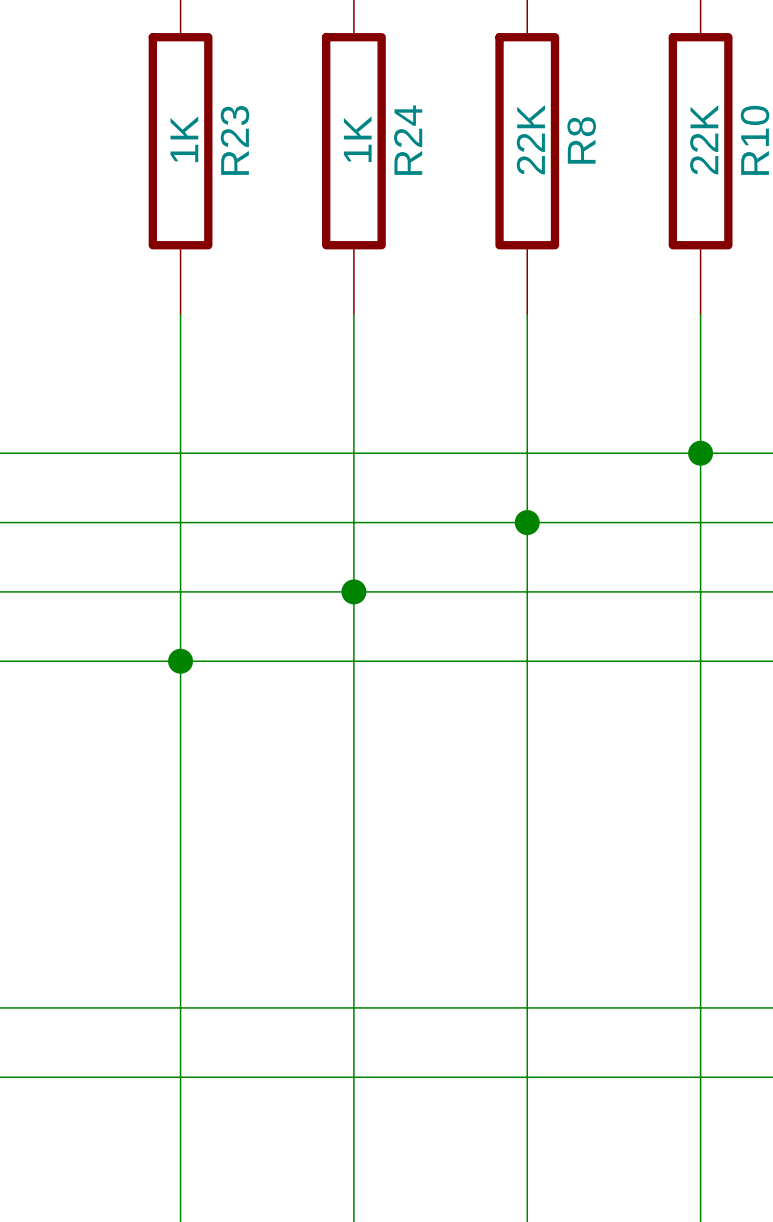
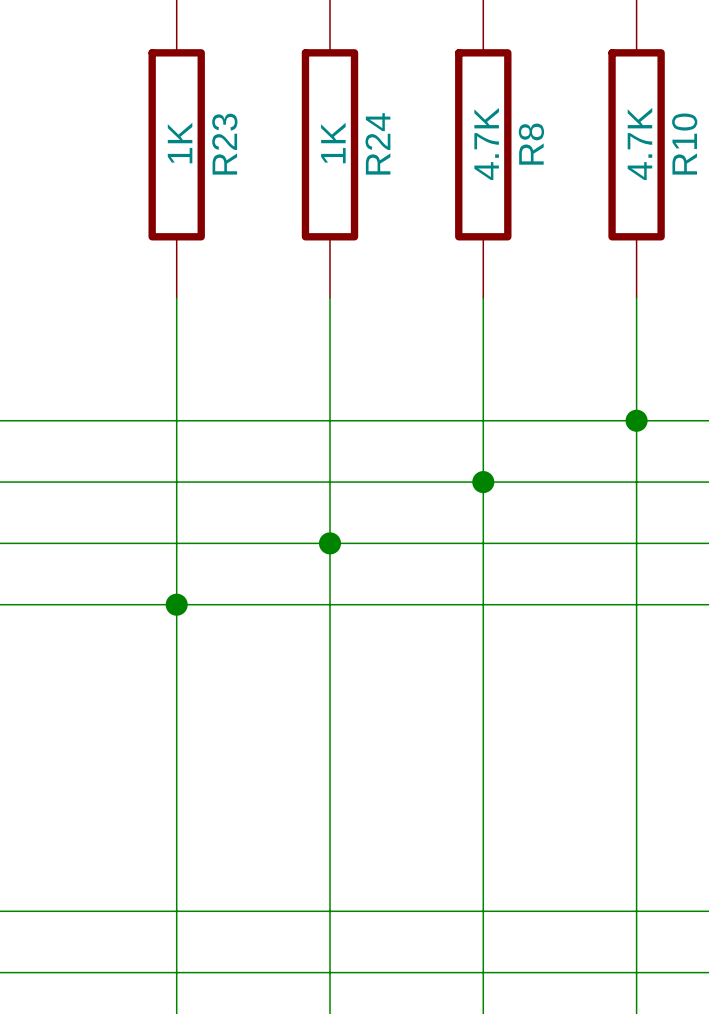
R8 value: 22K (530, 139) -> 4.7K (486, 143)
R10 value: 22K (704, 139) -> 4.7K (639, 143)

